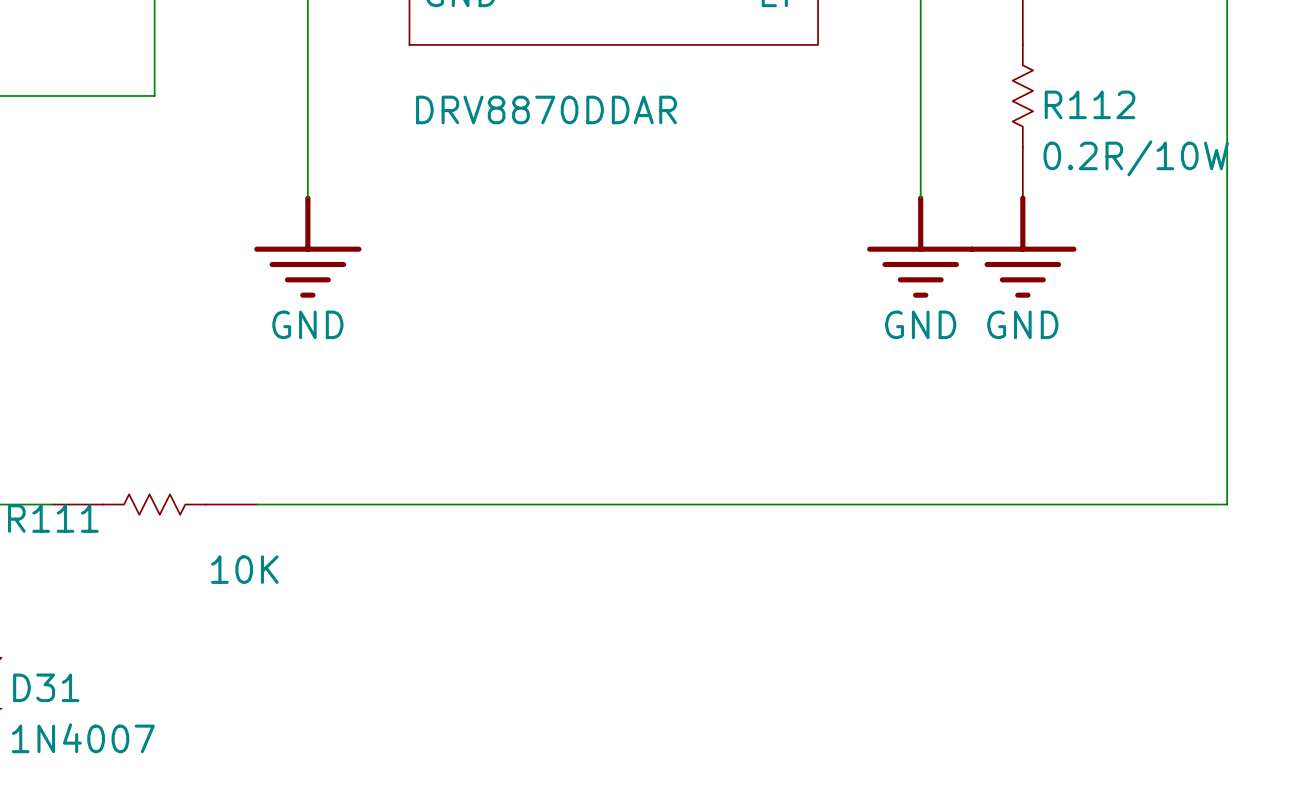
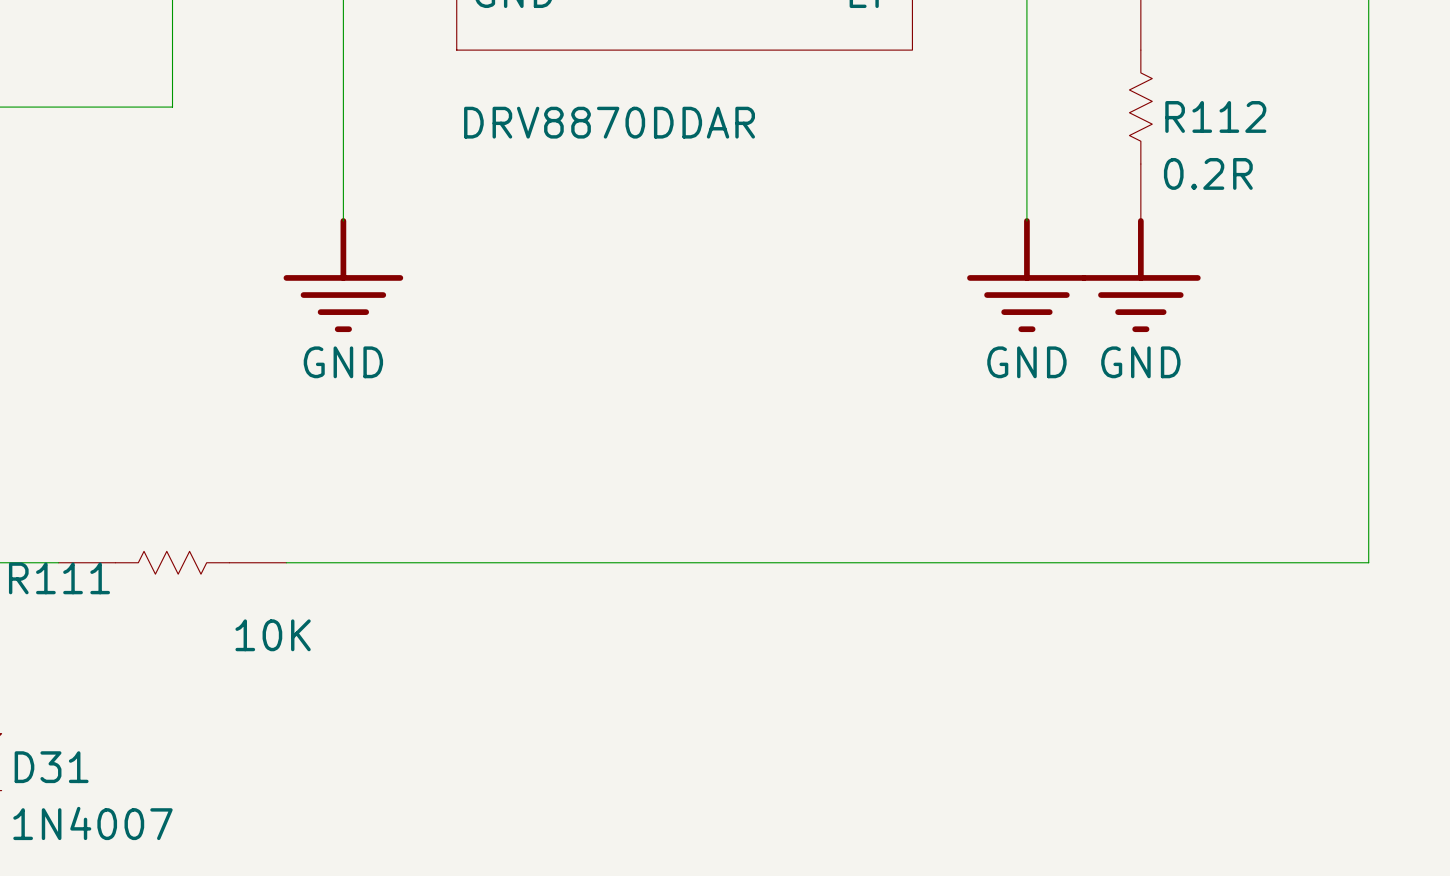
R112 value: 0.2R/10W (1136, 158) -> 0.2R (1208, 173)

